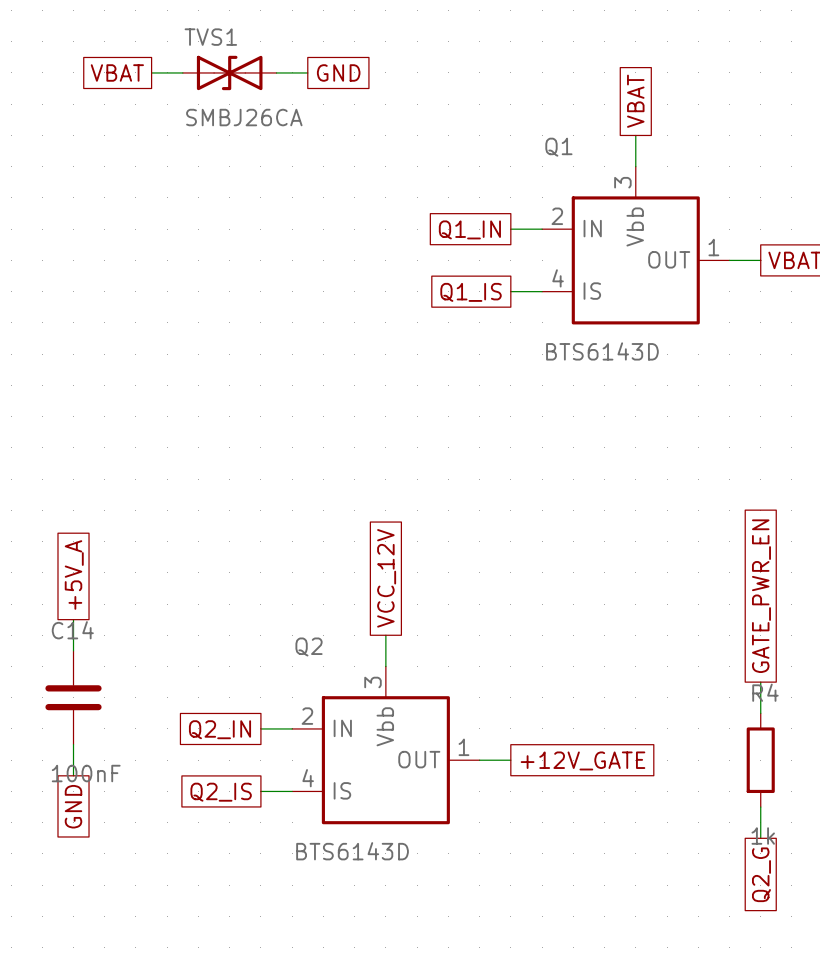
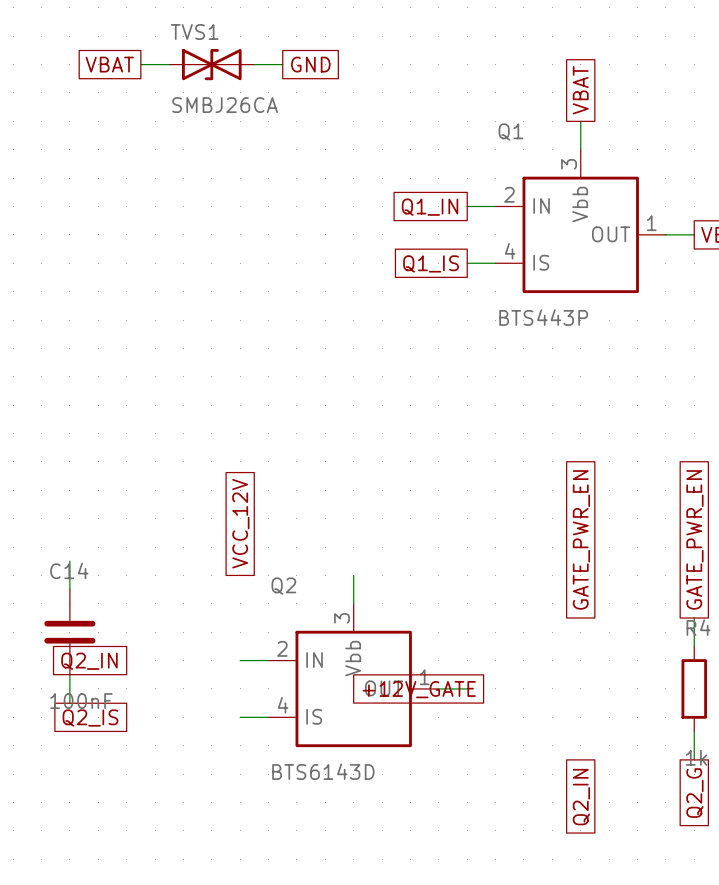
Q1 value: BTS6143D (602, 351) -> BTS443P (543, 317)
global label: +5V_A (74, 574) -> none
global label position: VCC_12V (386, 578) -> VCC_12V (240, 523)
global label: none -> GATE_PWR_EN (581, 539)
global label position: Q2_IN (220, 729) -> Q2_IN (89, 661)
global label position: +12V_GATE (583, 760) -> +12V_GATE (419, 689)
global label position: Q2_IS (221, 792) -> Q2_IS (90, 718)
global label: GND (73, 806) -> none
global label: none -> Q2_IN (581, 797)

